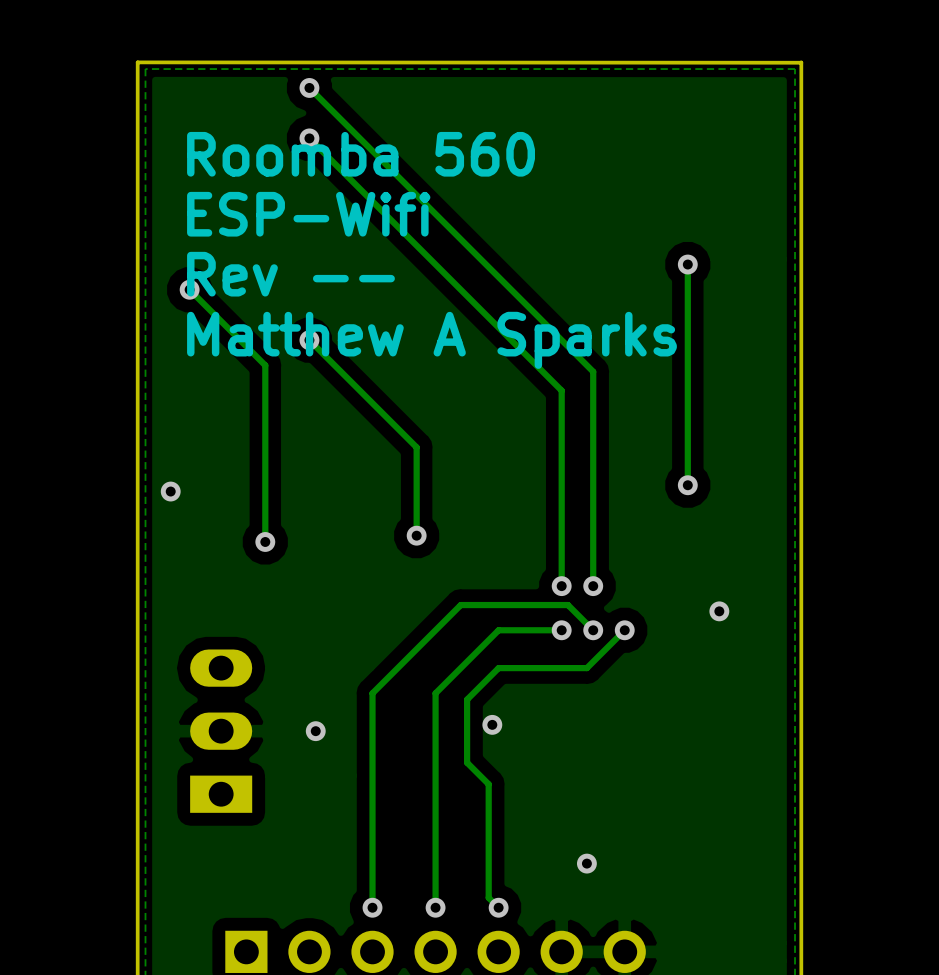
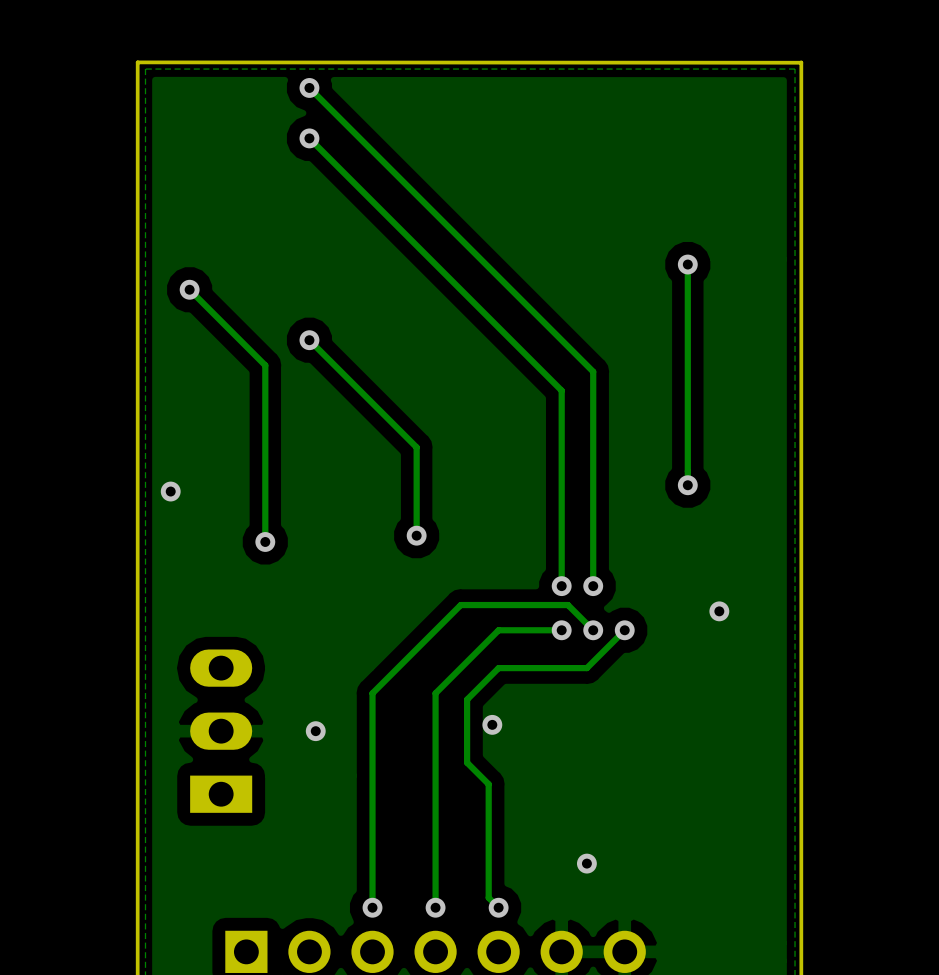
text: Roomba 560 (361, 154) -> none
text: ESP-Wifi (308, 214) -> none
text: Rev -- (290, 274) -> none
text: Matthew A Sparks (431, 340) -> none

